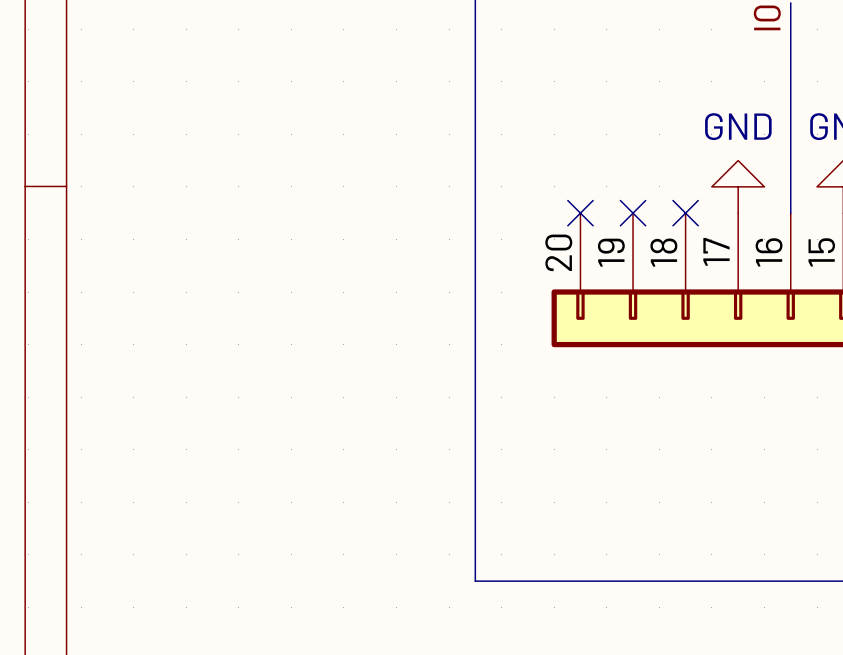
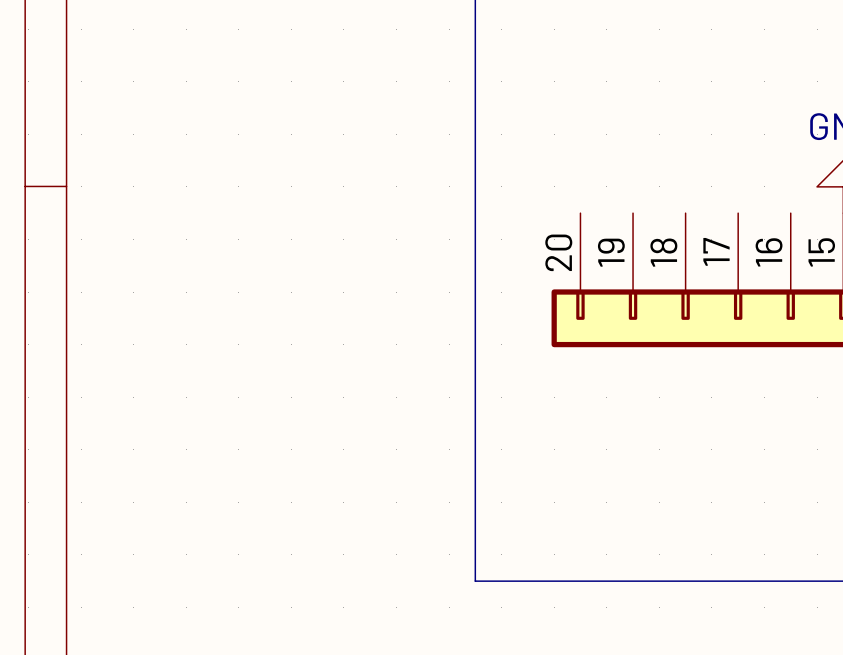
wire: (790, 2) (790, 213) -> none
label: I0 (767, 17) -> none
power symbol: GND (738, 186) -> none
no-connect mark: (580, 213) -> none
no-connect mark: (633, 213) -> none
no-connect mark: (685, 213) -> none

